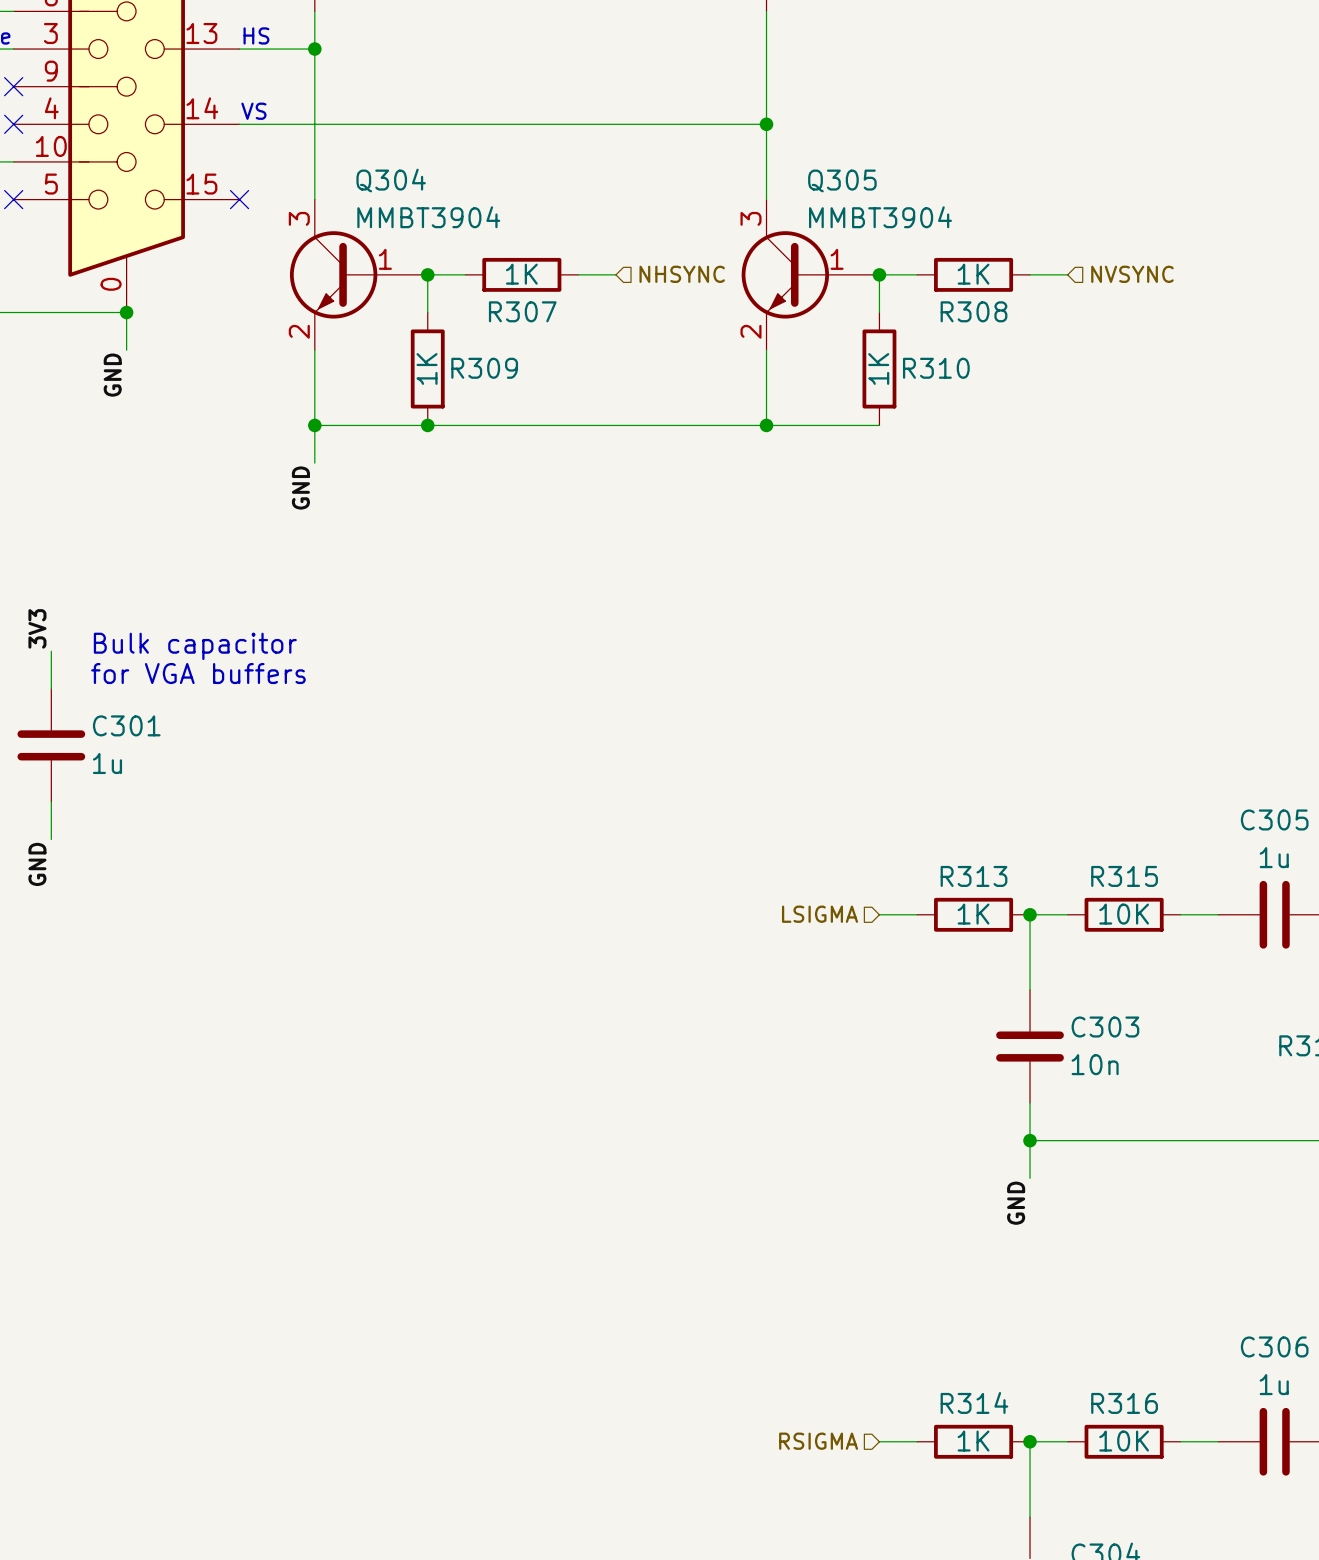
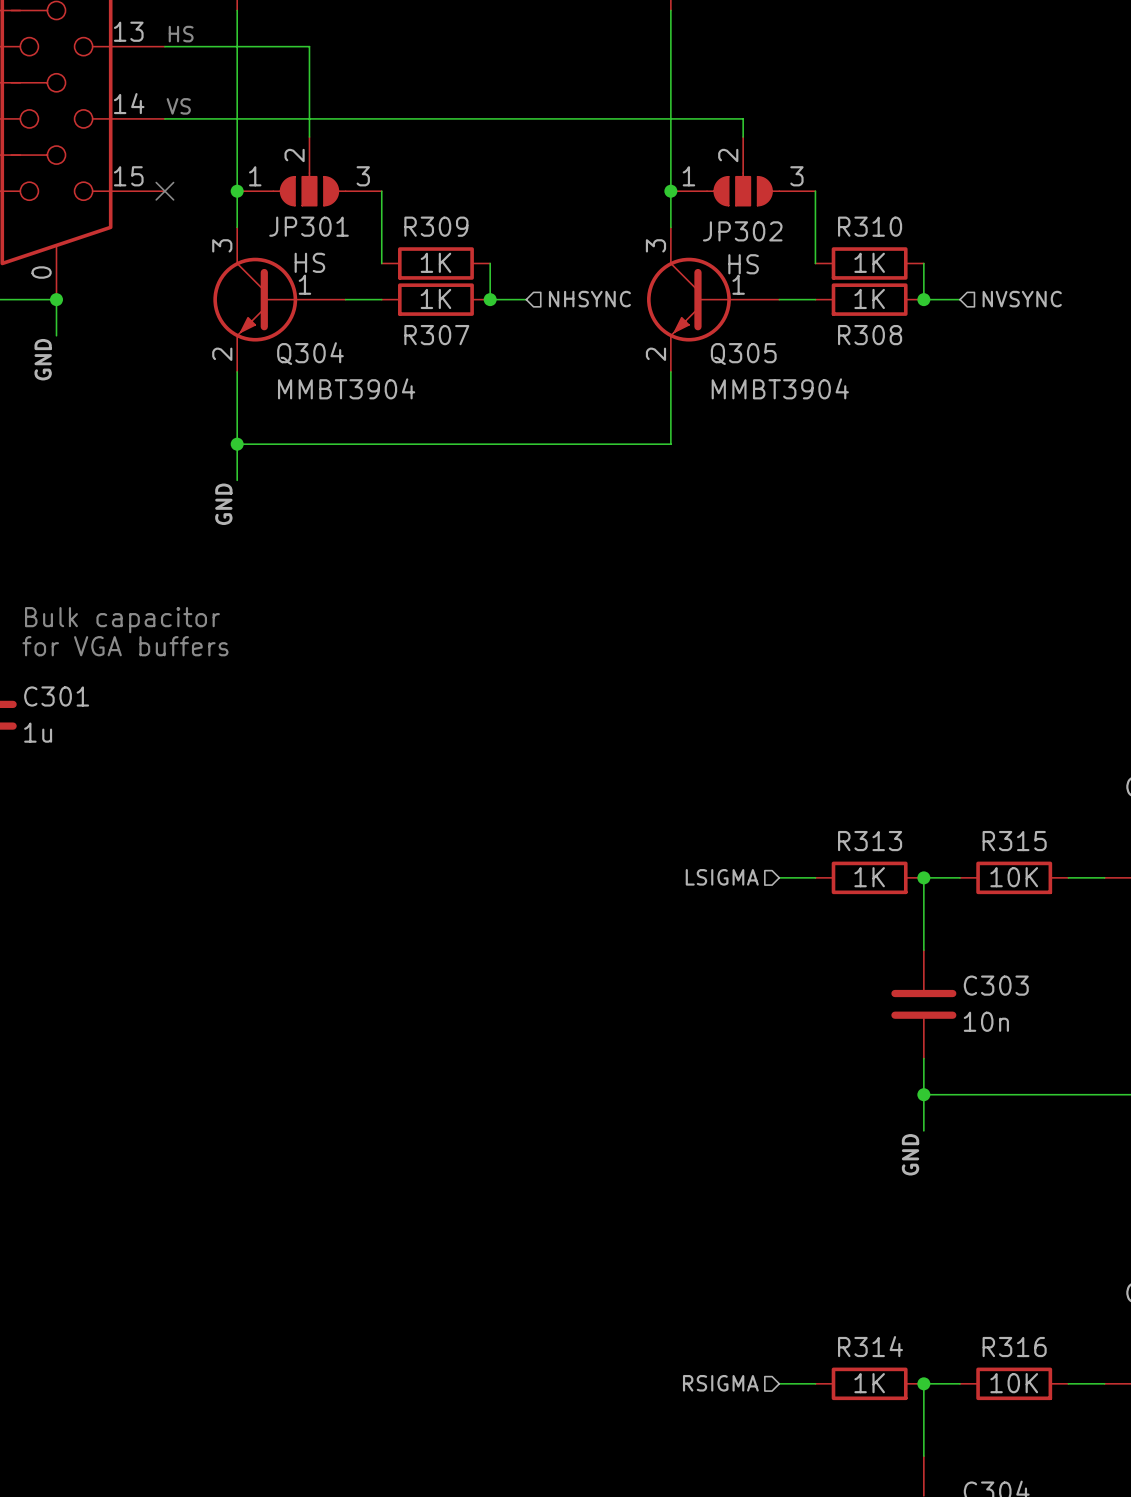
wire: none -> (237, 46) (309, 46) (309, 136)
junction: (314, 49) -> none
wire: none -> (670, 118) (743, 118) (743, 136)
junction: (766, 124) -> none
JP301: none -> HS (309, 171)
JP302: none -> HS (743, 171)
Q304 name position: Q304 (391, 180) -> Q304 (310, 353)
Q305 name position: Q305 (842, 180) -> Q305 (743, 354)
junction: none -> (237, 191)
wire: none -> (381, 191) (381, 263)
junction: none -> (670, 191)
wire: none -> (815, 191) (815, 263)
Q304 value position: MMBT3904 (428, 217) -> MMBT3904 (346, 388)
Q305 value position: MMBT3904 (880, 217) -> MMBT3904 (780, 388)
Q304 position: (358, 274) -> (279, 299)
junction: (427, 274) -> none
wire: (465, 274) (427, 274) (427, 312) -> (381, 299) (345, 299)
wire: (578, 274) (615, 274) -> (490, 263) (490, 299) (526, 299)
hierarchical label position: NHSYNC (682, 274) -> NHSYNC (589, 299)
Q305 position: (810, 274) -> (713, 299)
junction: (879, 274) -> none
wire: (917, 274) (879, 274) (879, 312) -> (815, 299) (779, 299)
wire: (1030, 274) (1067, 274) -> (923, 263) (923, 299) (959, 299)
hierarchical label position: NVSYNC (1132, 274) -> NVSYNC (1022, 299)
R307 name: R307 (522, 311) -> R309 (436, 226)
R308 name: R308 (973, 311) -> R310 (870, 226)
R307: none -> 1K (435, 299)
junction: none -> (490, 299)
R308: none -> 1K (869, 299)
junction: none -> (923, 299)
R309: 1K (427, 368) -> none
R310: 1K (879, 368) -> none
wire: (314, 425) (879, 425) -> none
junction position: (314, 425) -> (237, 444)
junction: (427, 425) -> none
wire: none -> (670, 408) (670, 444) (237, 444) (237, 480)
junction: (766, 425) -> none
label position: GND (300, 488) -> GND (223, 504)

